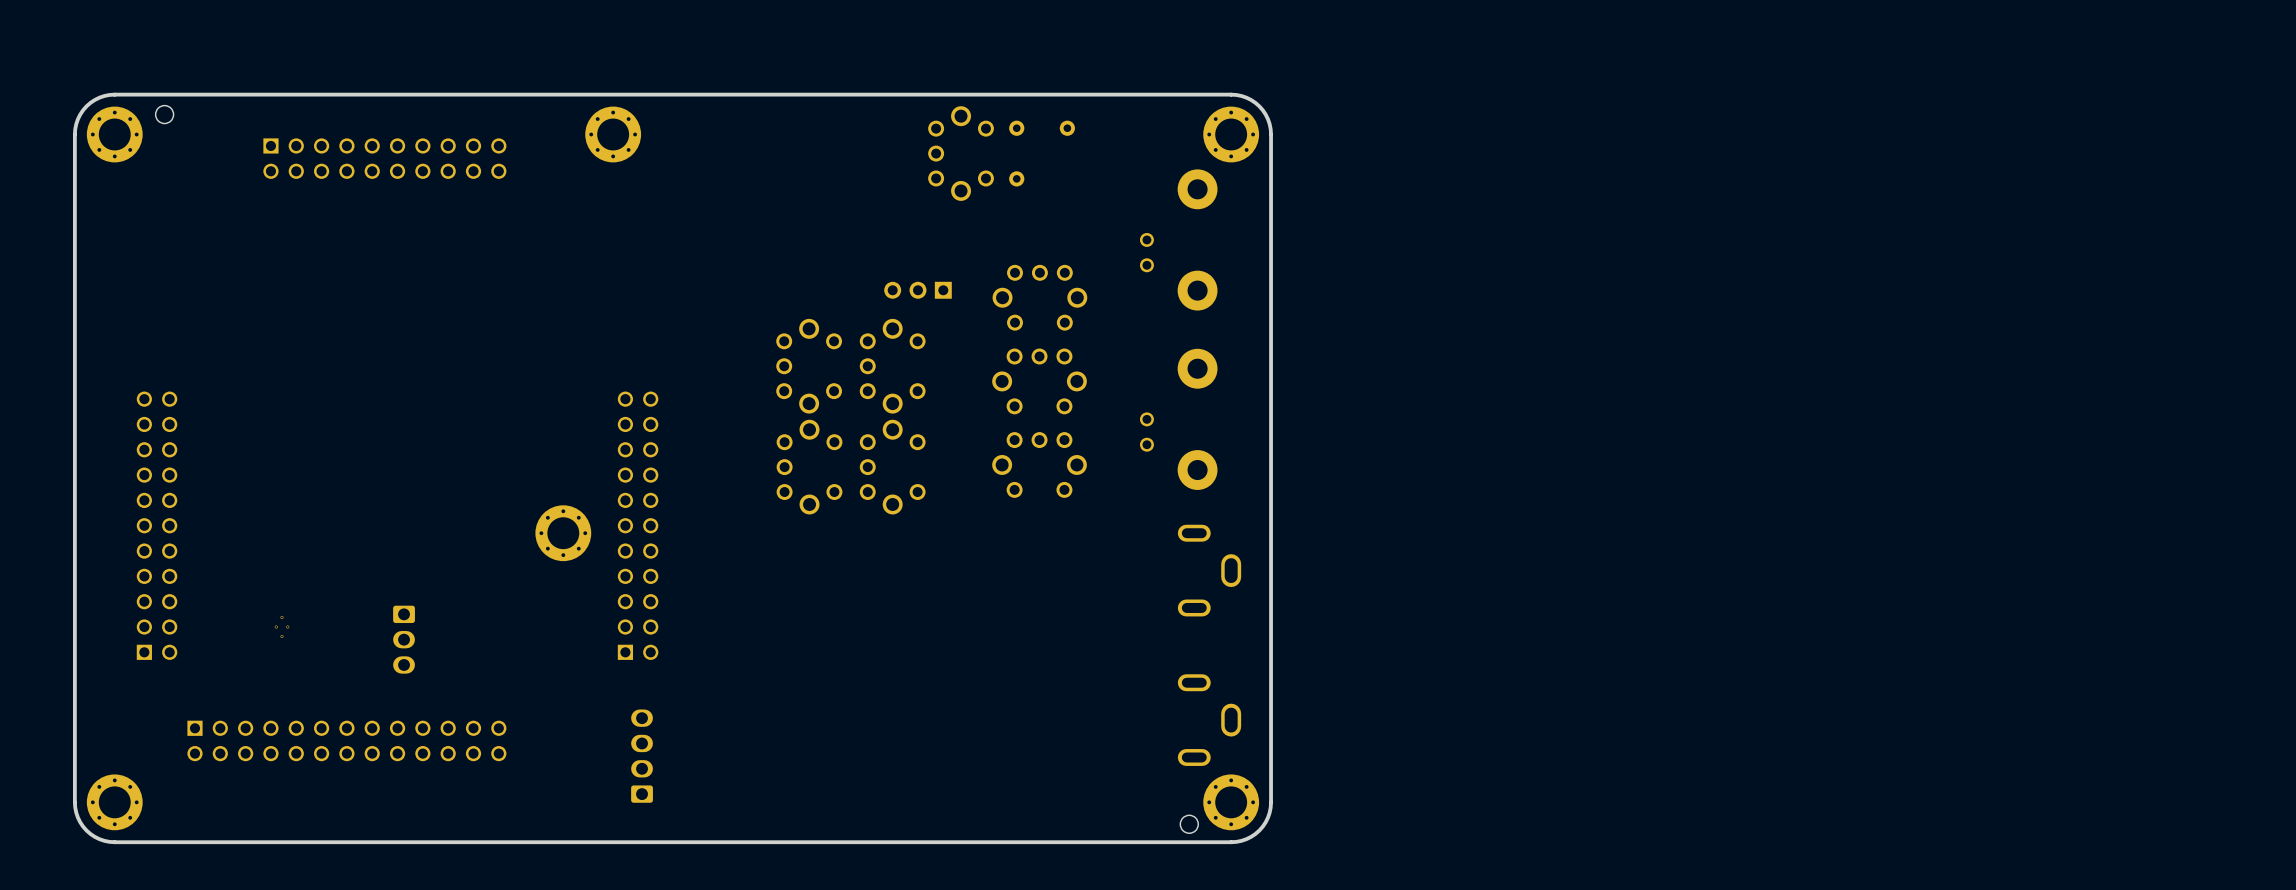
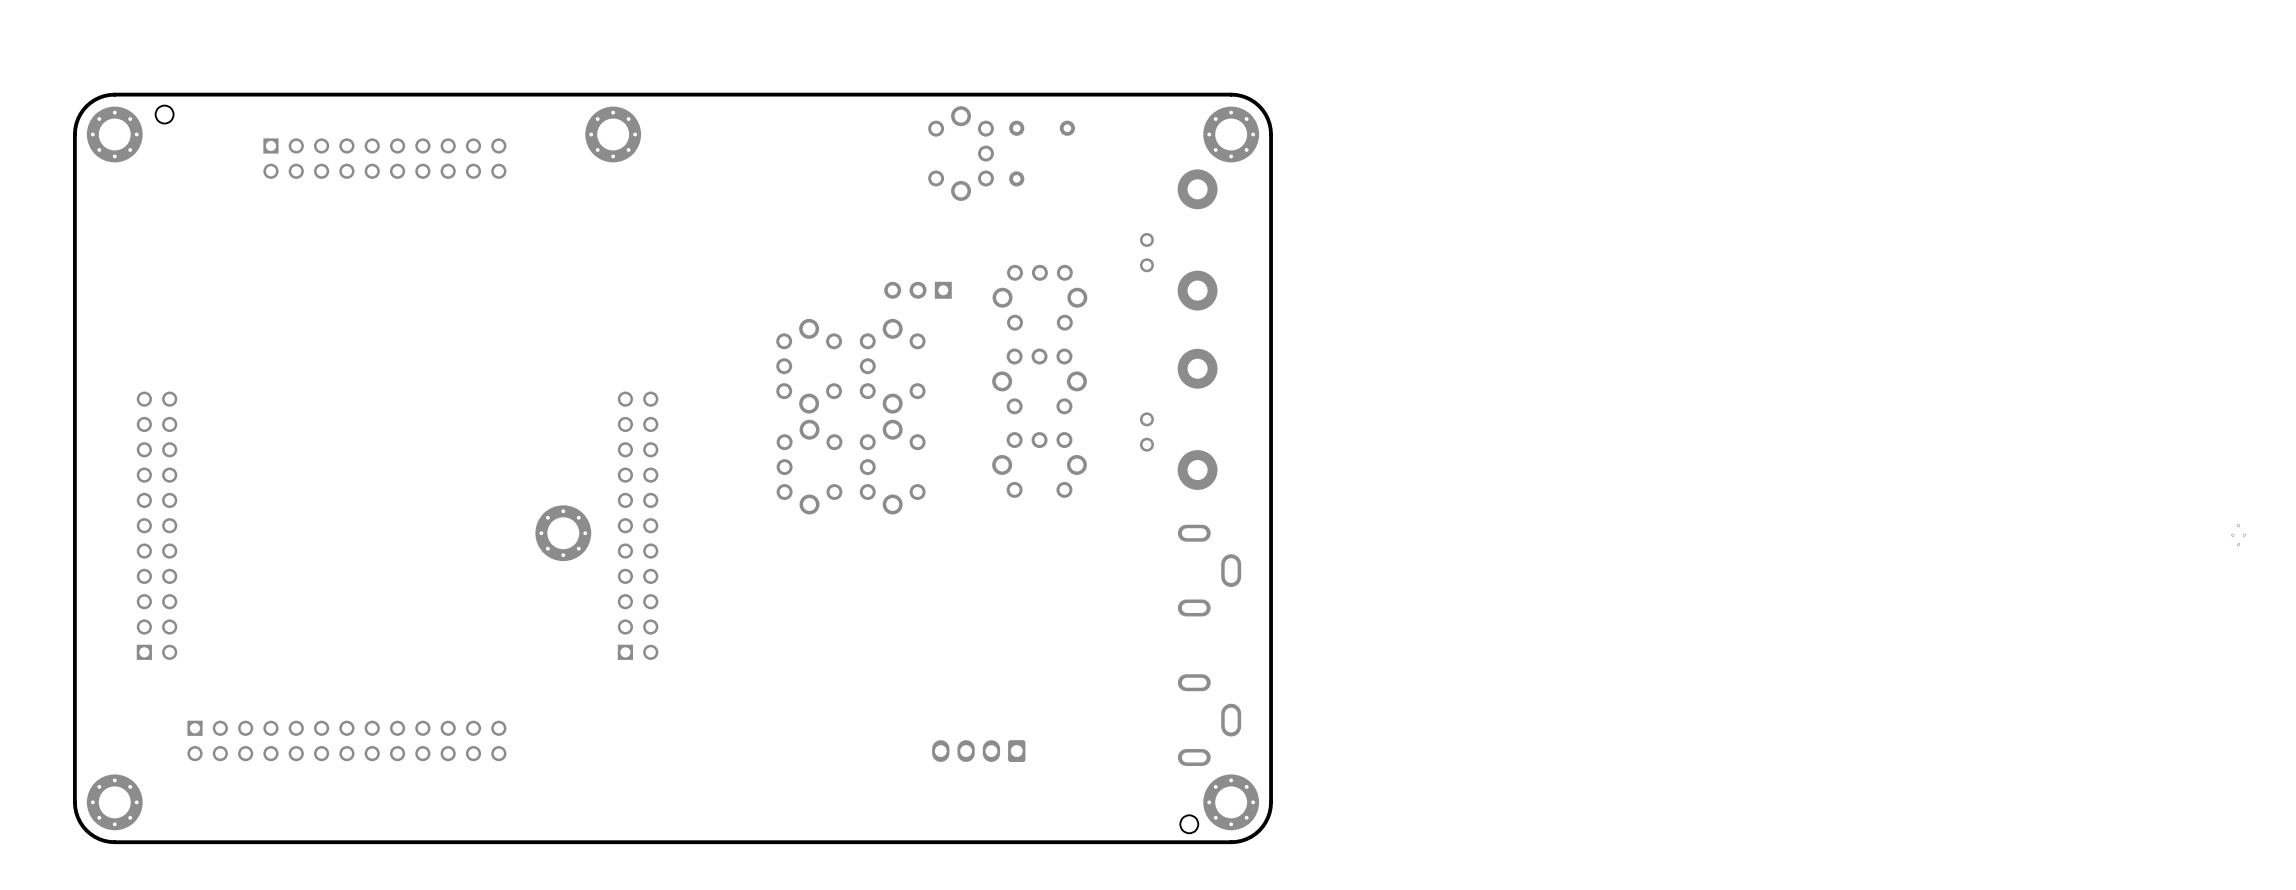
part rotation: 0° (961, 153) -> 180° (961, 153)
part: none -> (2238, 535)
part: (282, 627) -> none
part: (404, 639) -> none
part: none -> (978, 751)
part: (642, 756) -> none

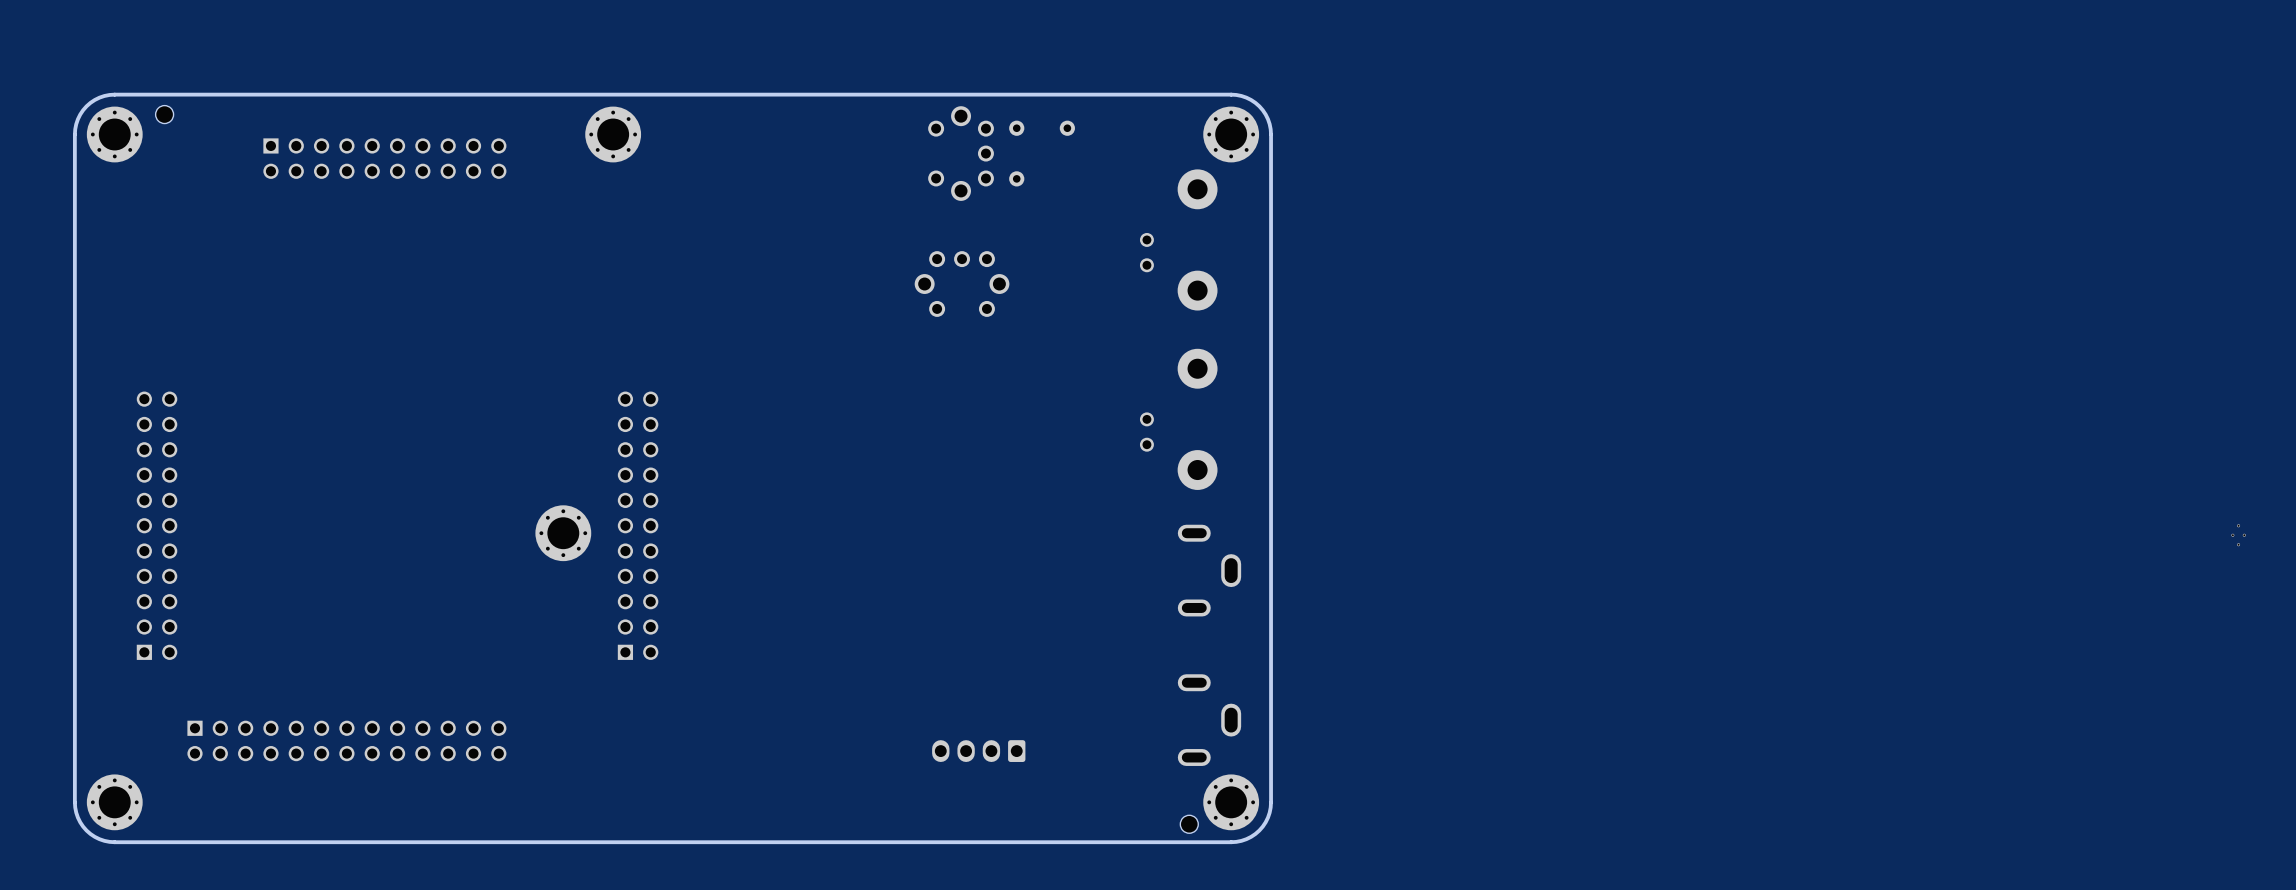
part: none -> (962, 284)
part: (917, 290) -> none
part: (1039, 297) -> none
part: (809, 366) -> none
part: (892, 366) -> none
part: (1039, 381) -> none
part: (1039, 464) -> none
part: (809, 467) -> none
part: (892, 467) -> none

